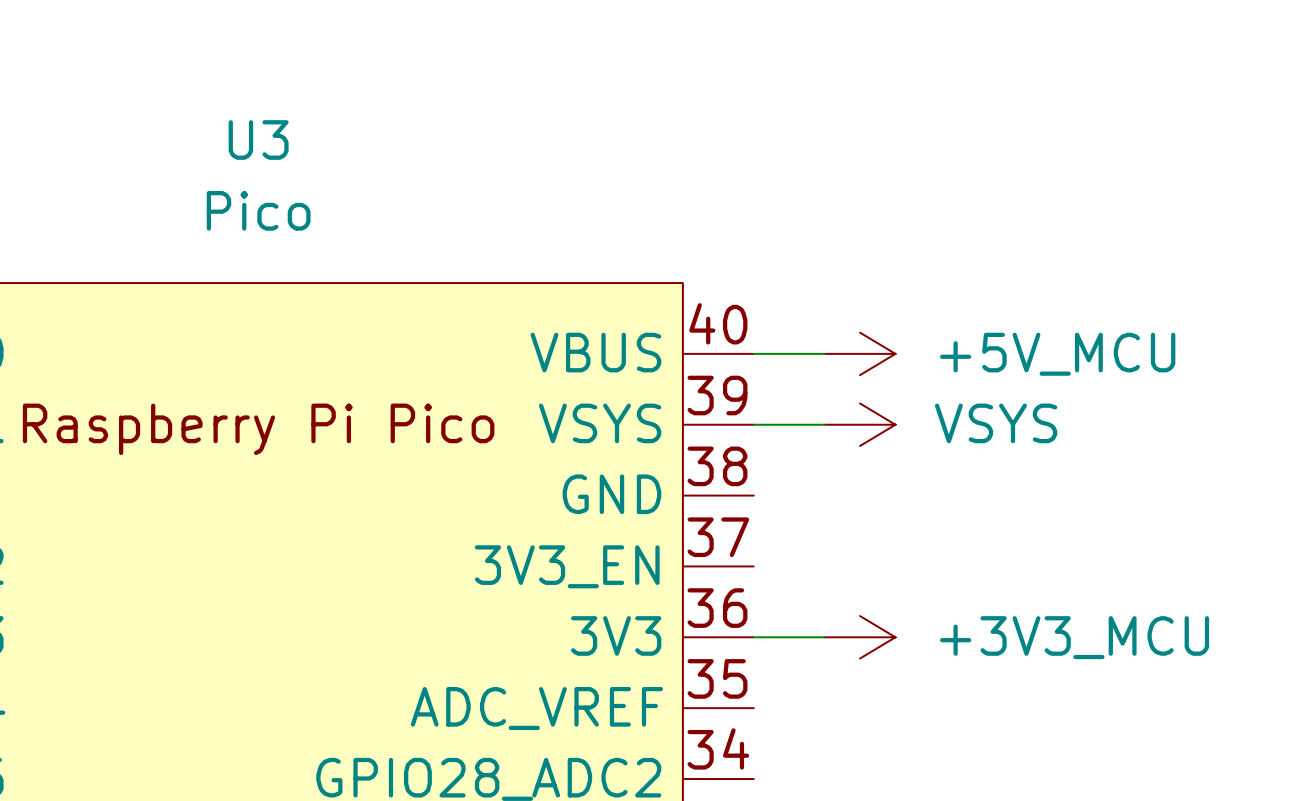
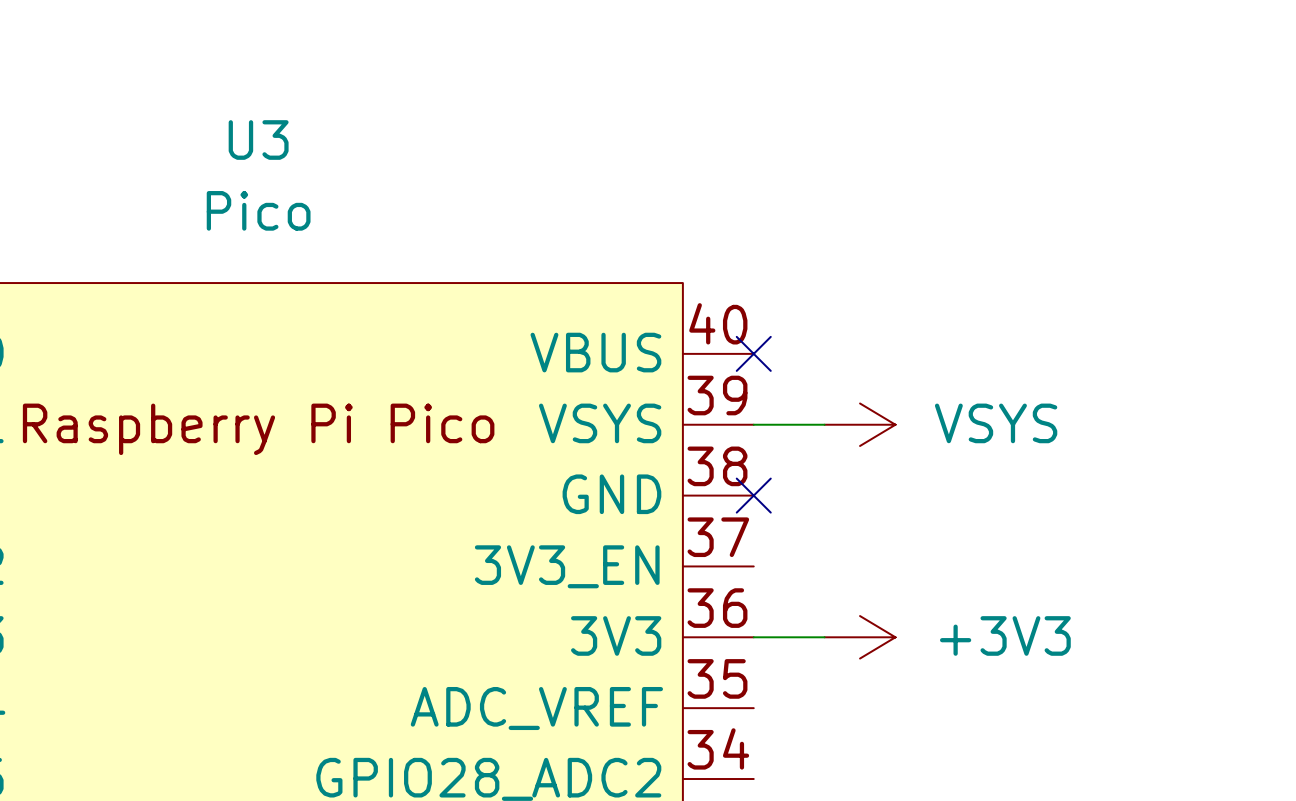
wire: (753, 353) (824, 353) -> none
no-connect mark: none -> (753, 353)
power symbol: +5V_MCU (860, 353) -> none
no-connect mark: none -> (753, 495)
power symbol: +3V3_MCU (860, 637) -> +3V3 (860, 637)

